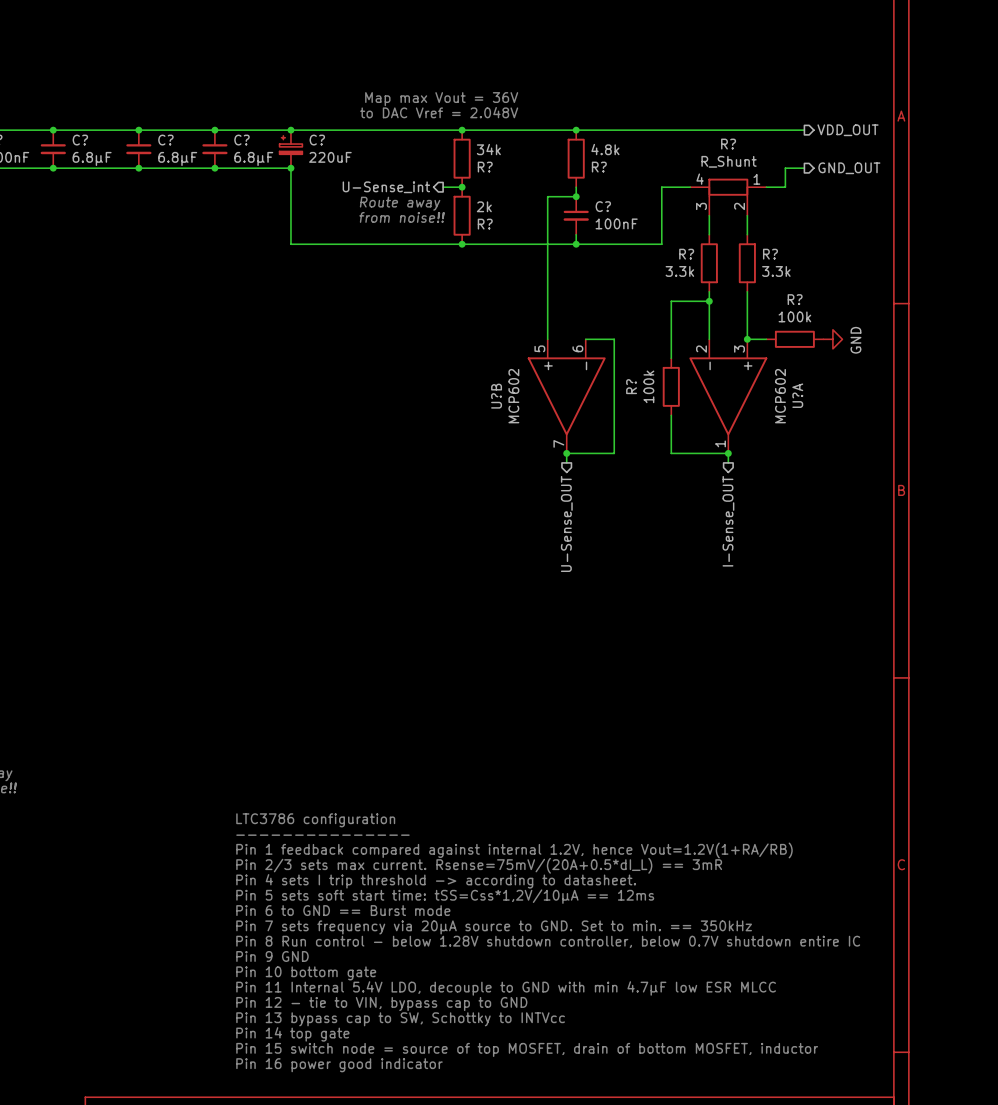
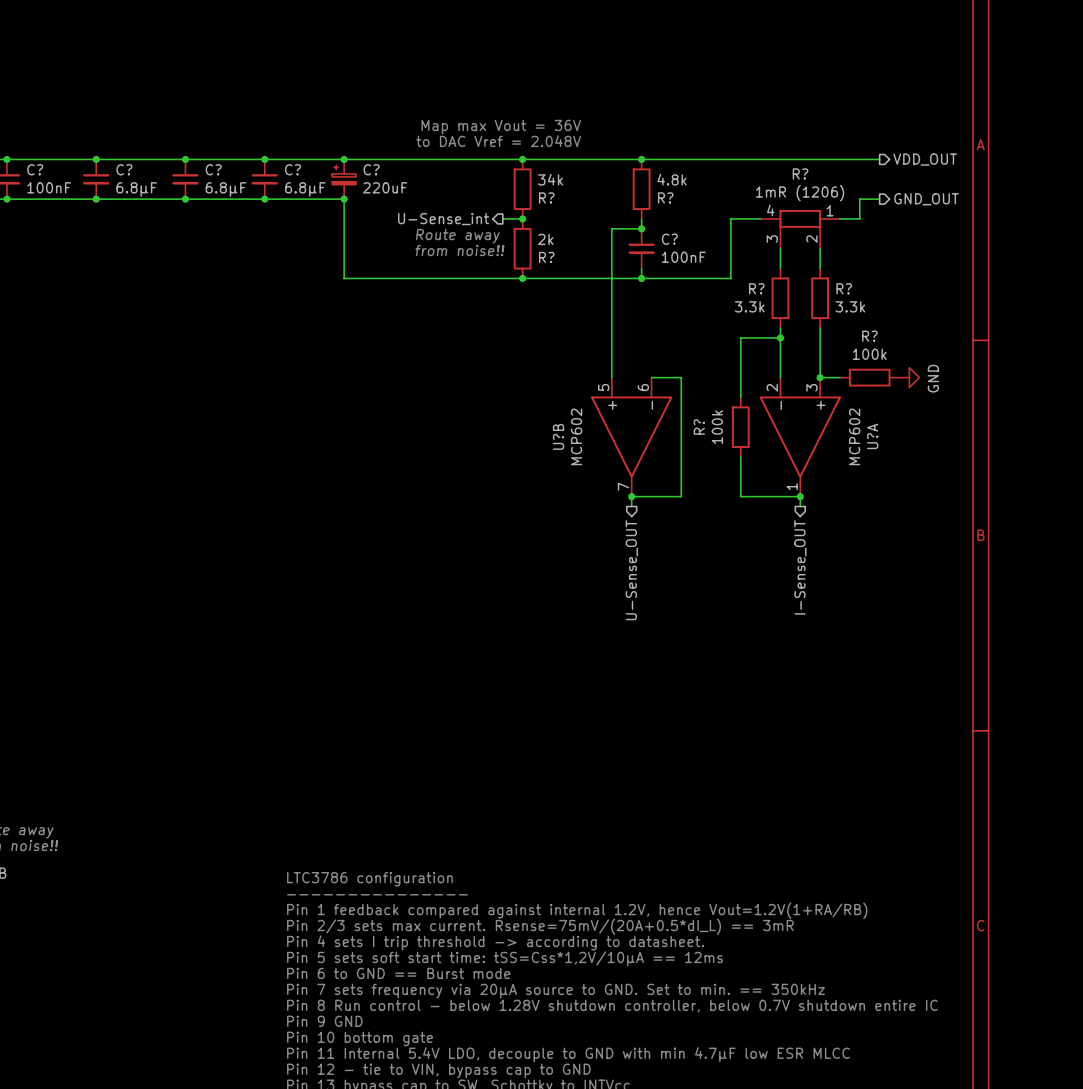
R? value: R_Shunt (729, 161) -> 1mR (1206) (800, 193)

